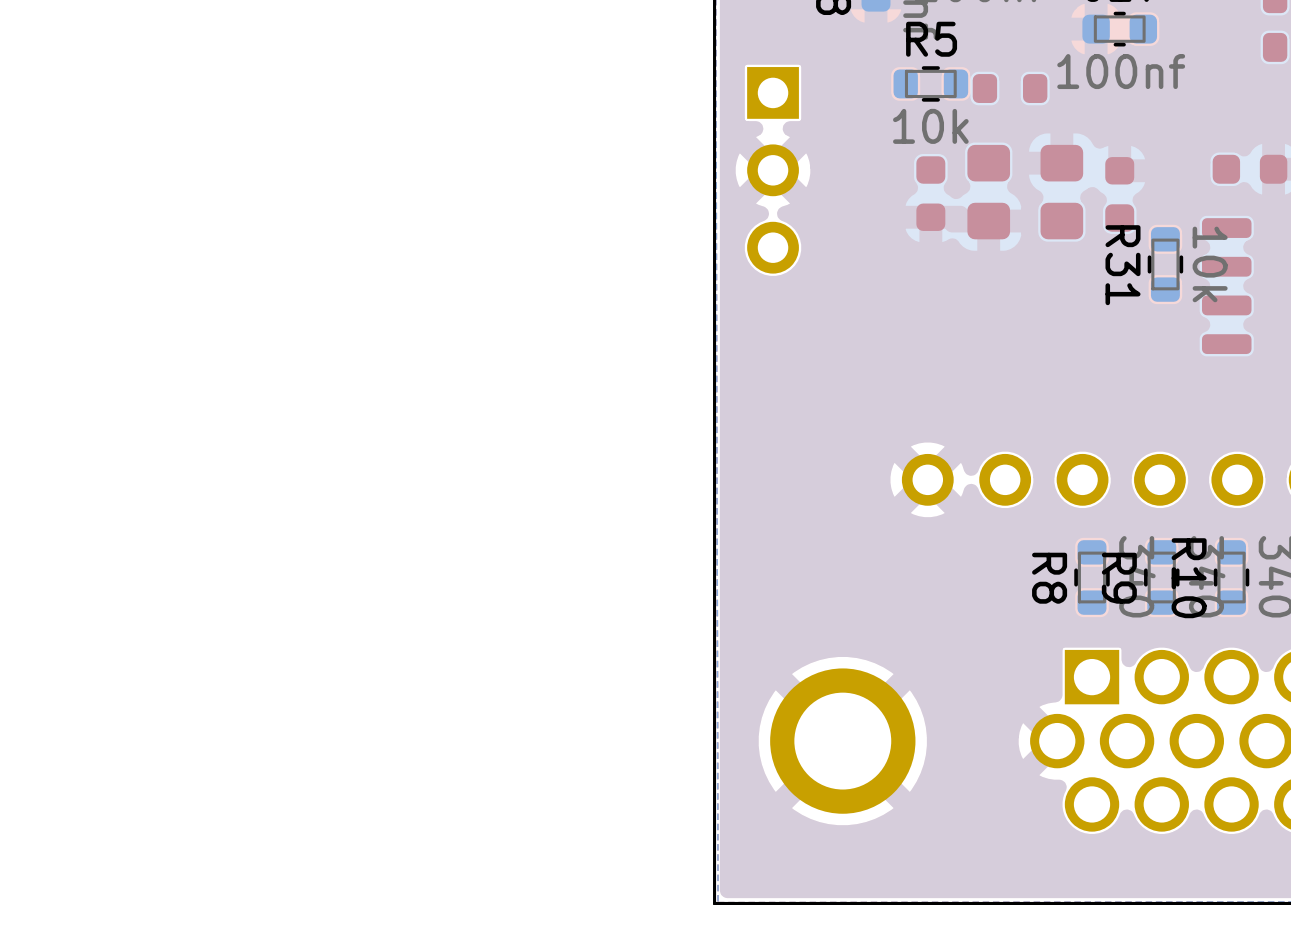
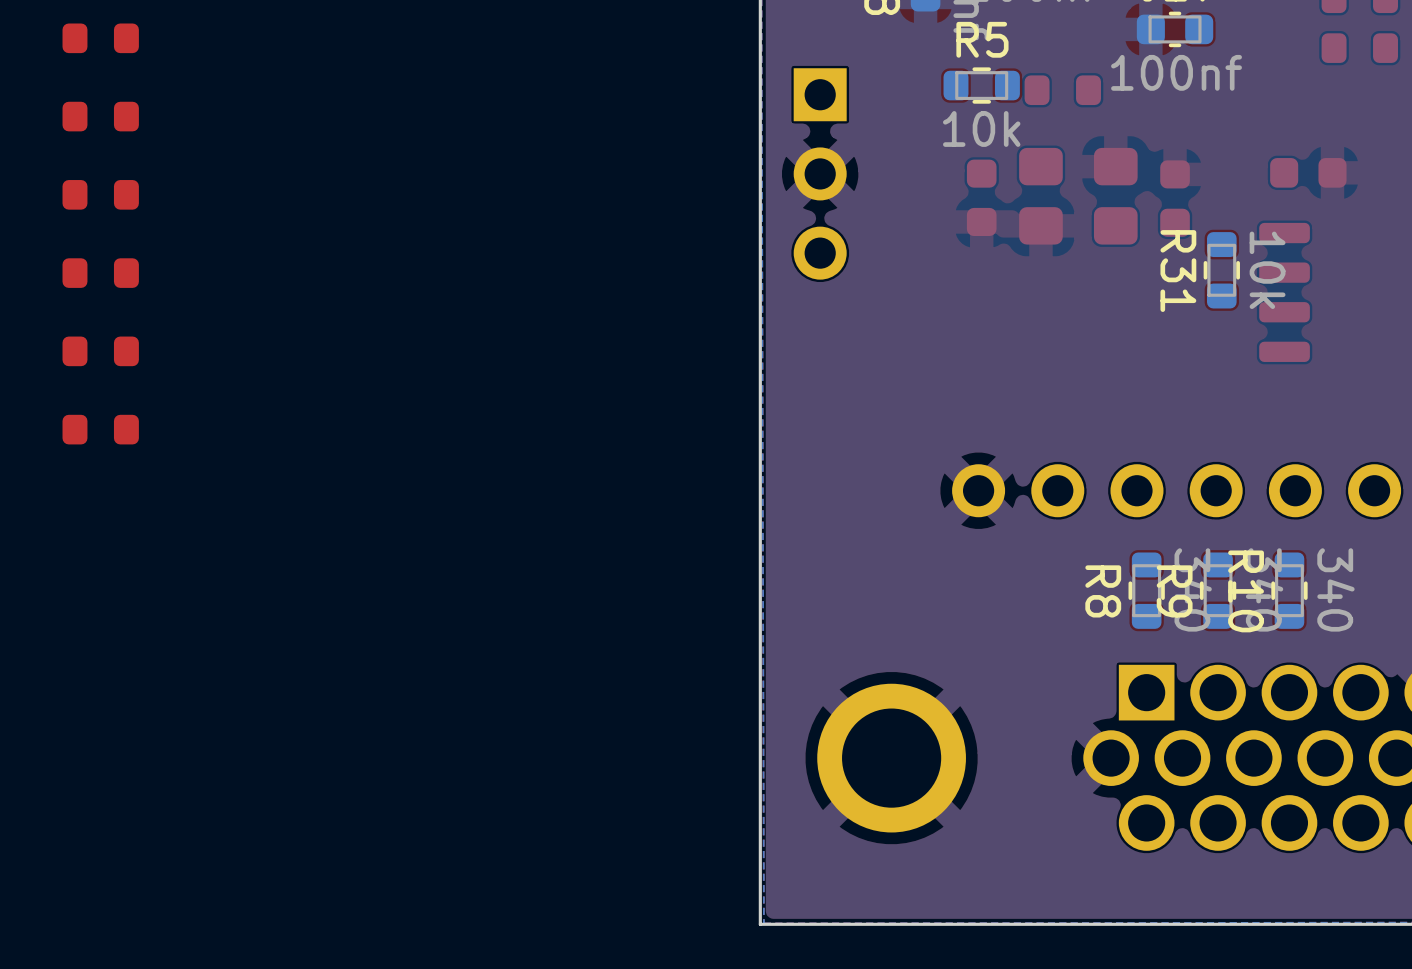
part: none -> (100, 38)
part: none -> (100, 116)
part: none -> (100, 194)
part: none -> (100, 273)
part: none -> (100, 351)
part: none -> (100, 429)

